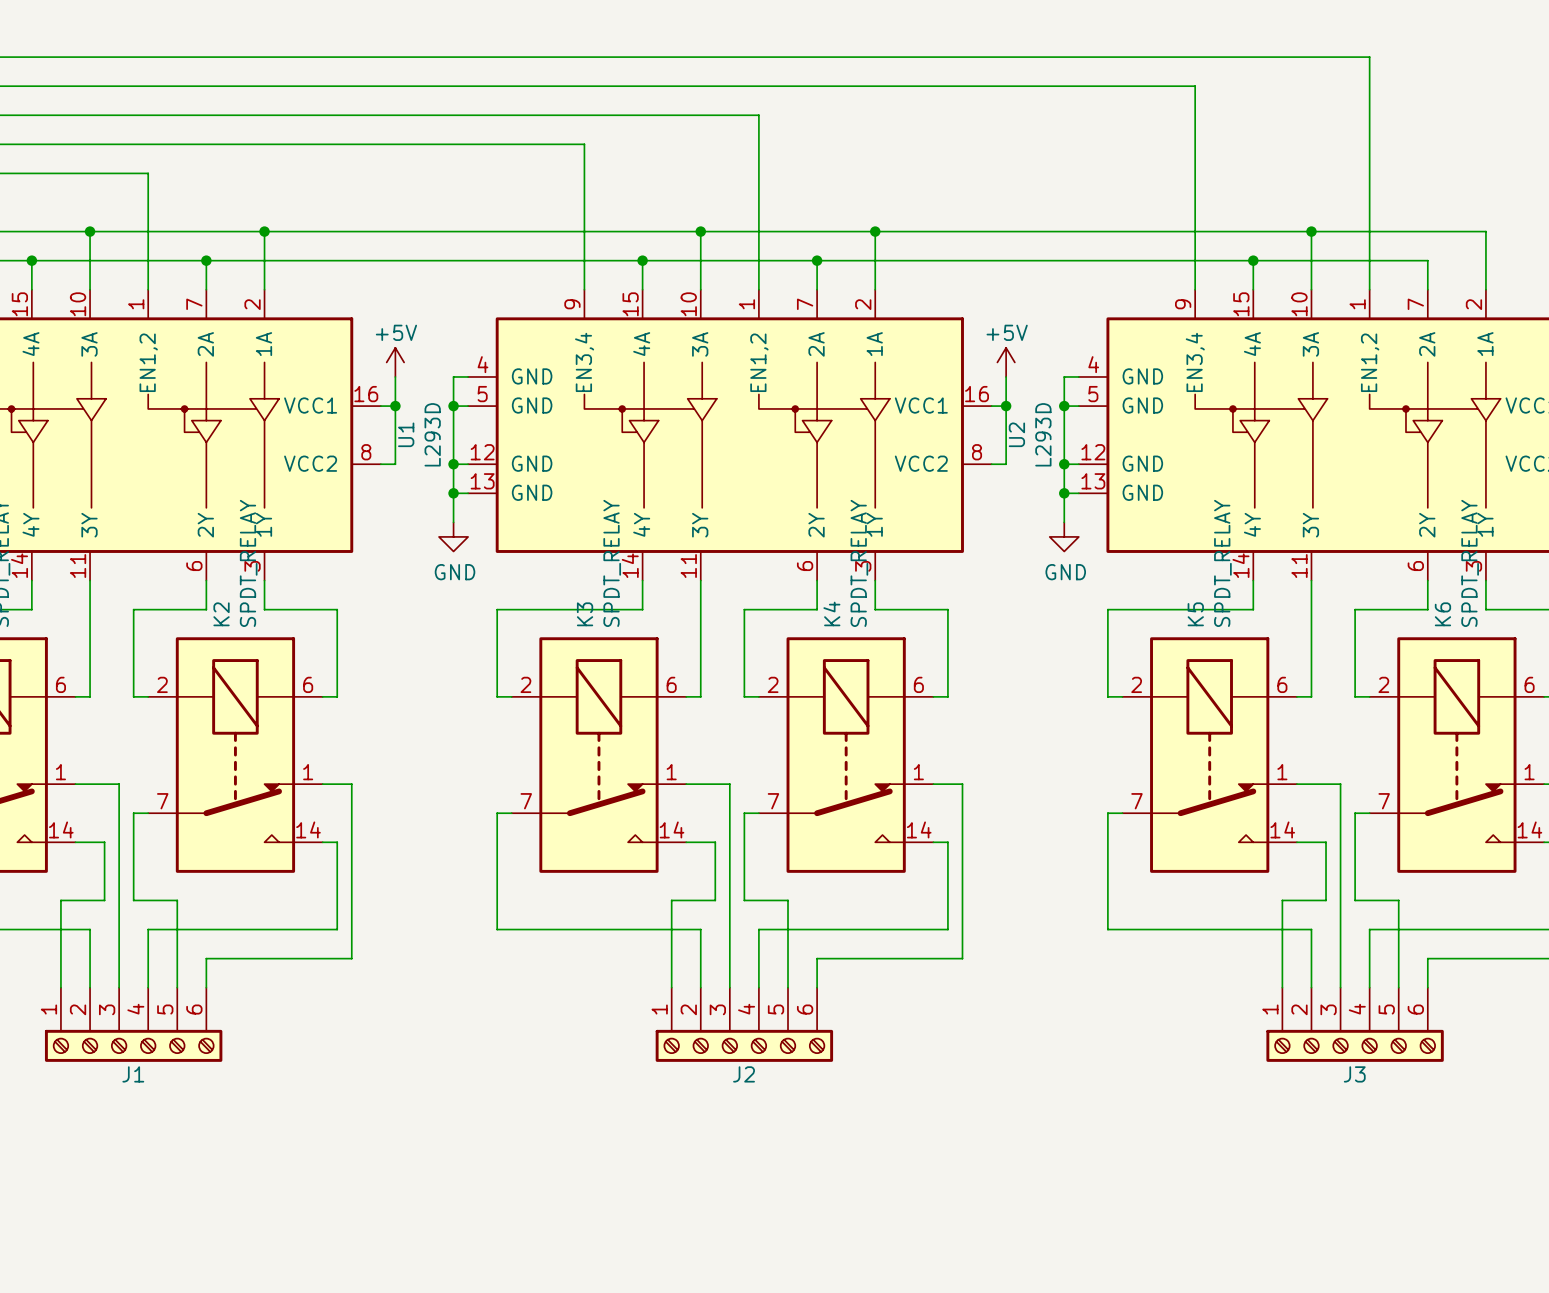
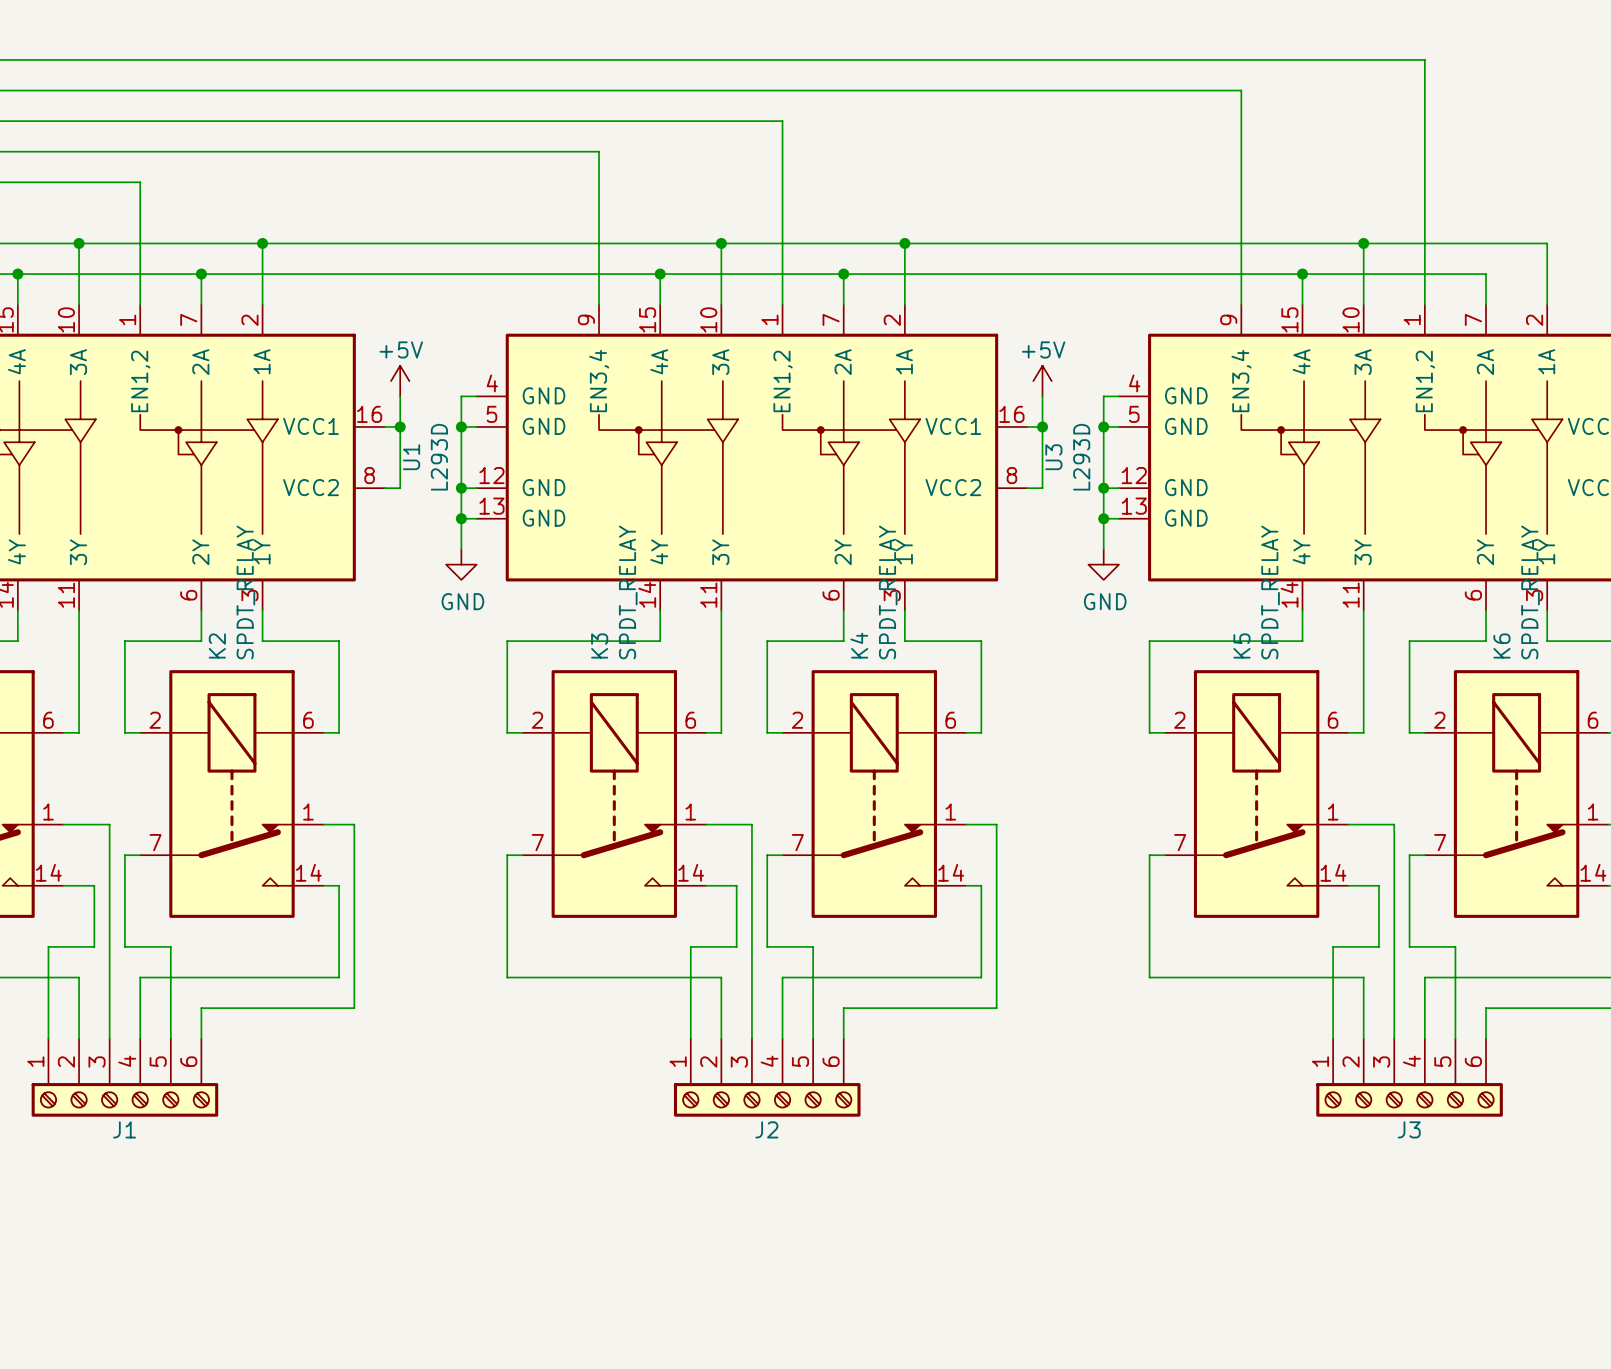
U2 name: U2 (1016, 434) -> U3 (1053, 457)

